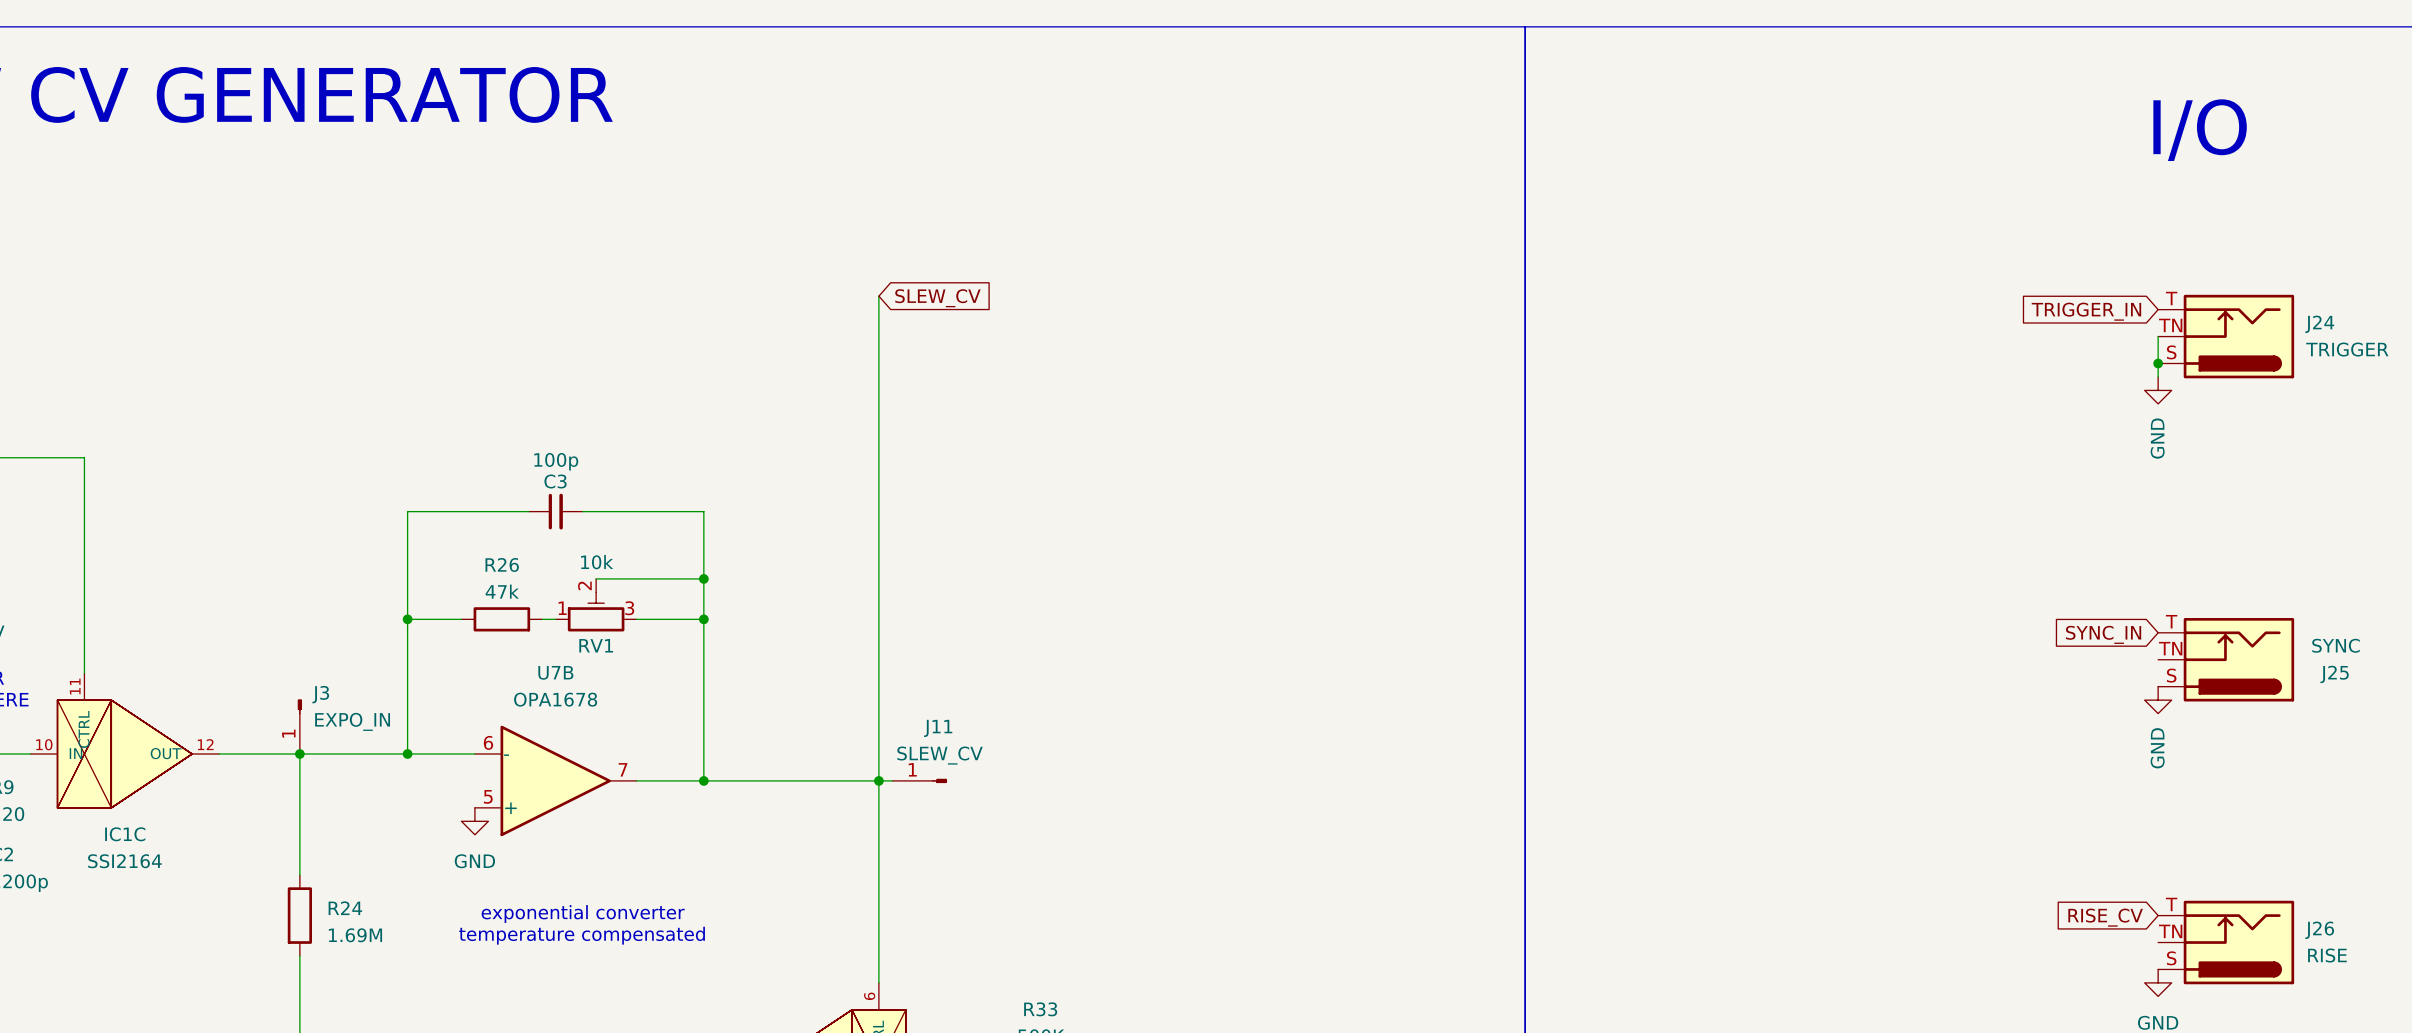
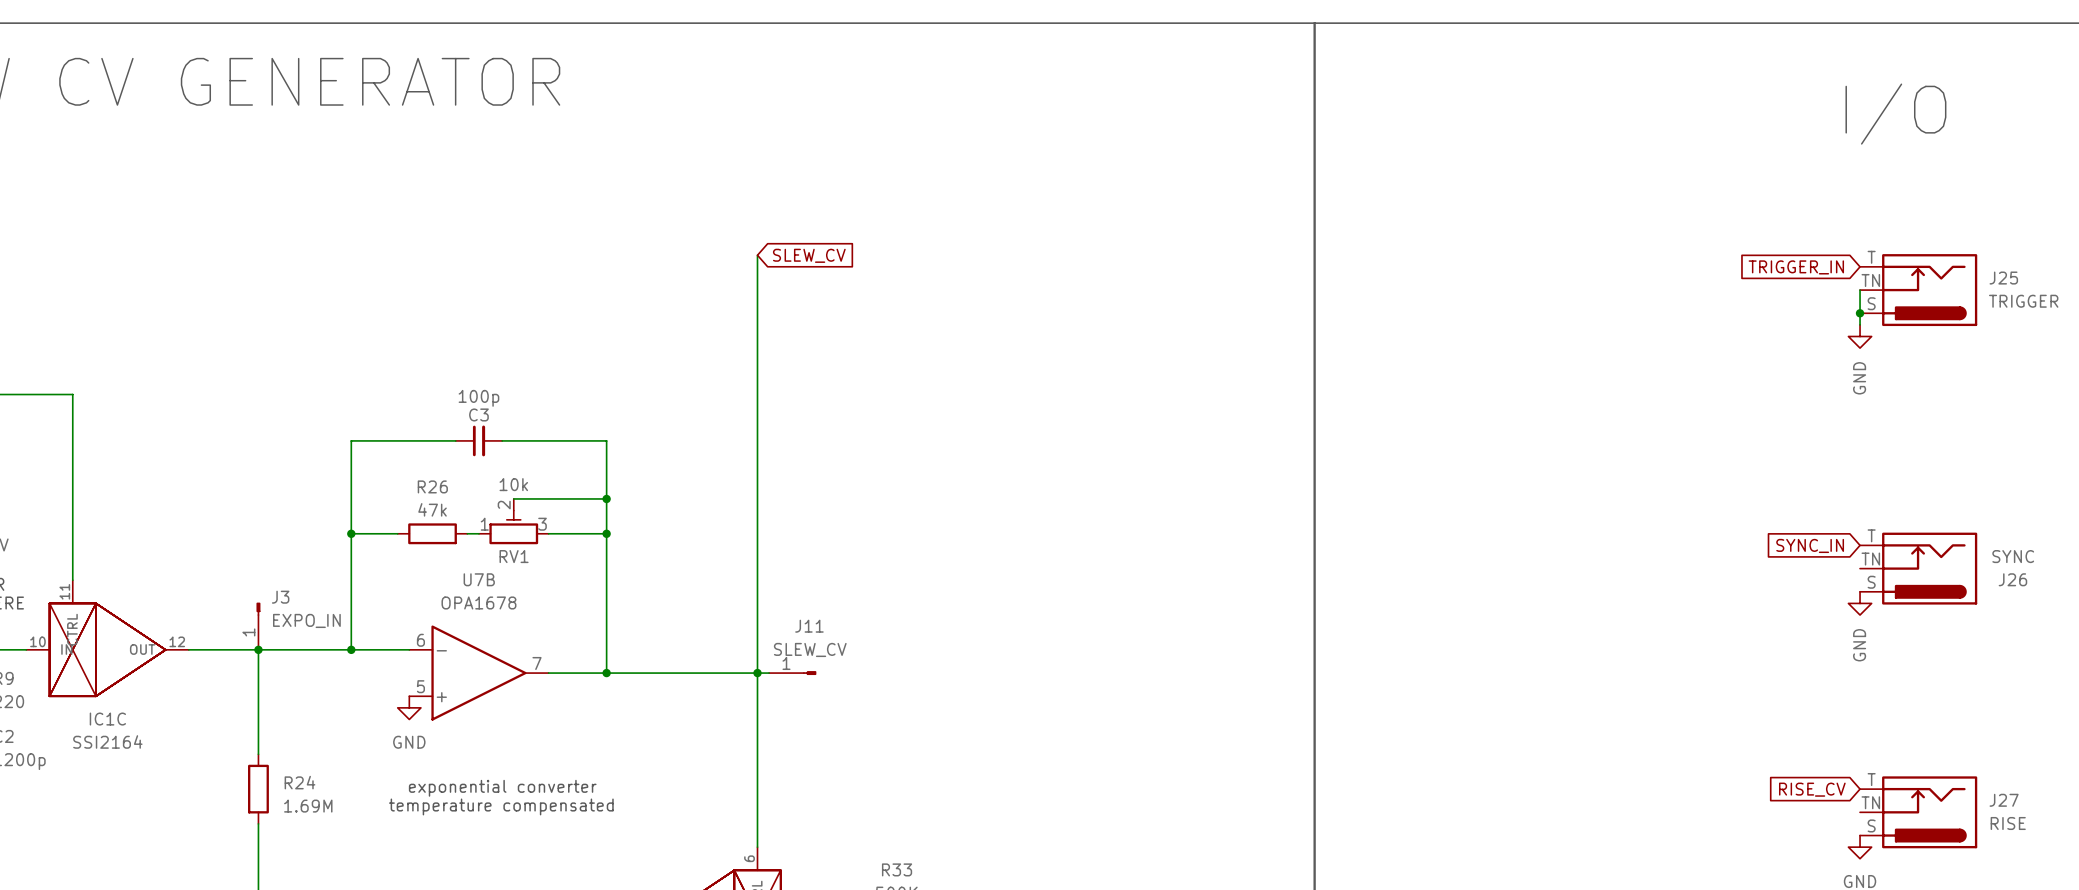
J24 name: J24 (2319, 324) -> J25 (2003, 278)
J25 name: J25 (2334, 674) -> J26 (2012, 579)
J26 name: J26 (2319, 930) -> J27 (2004, 800)

